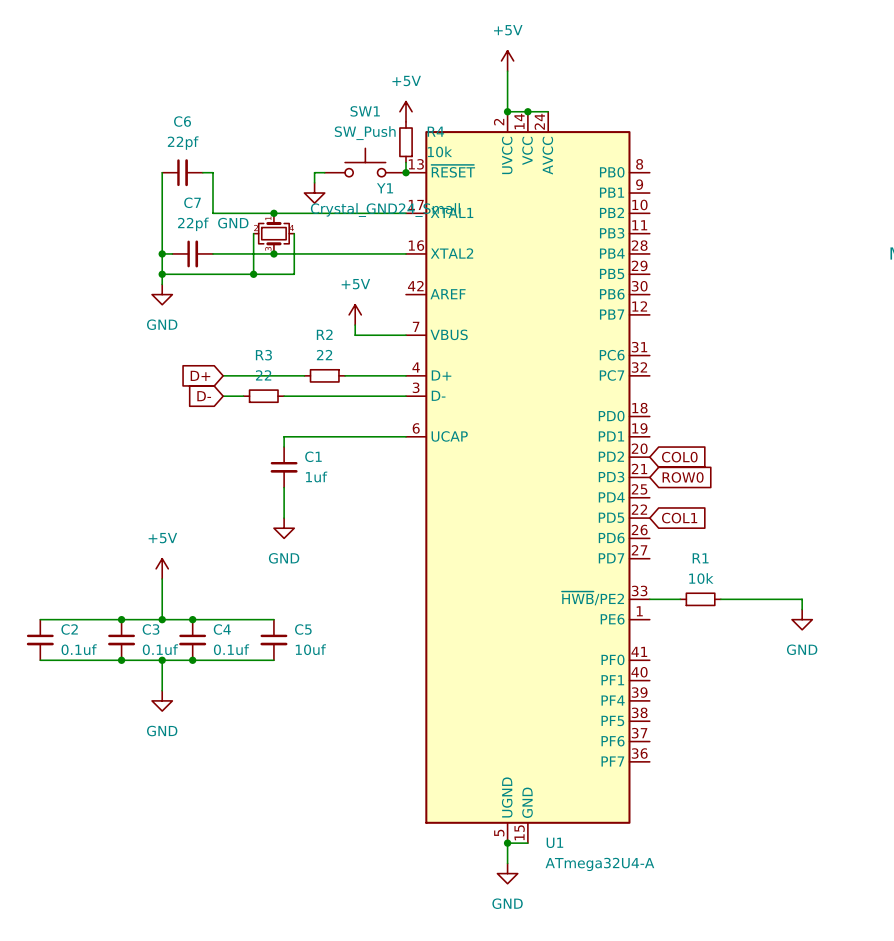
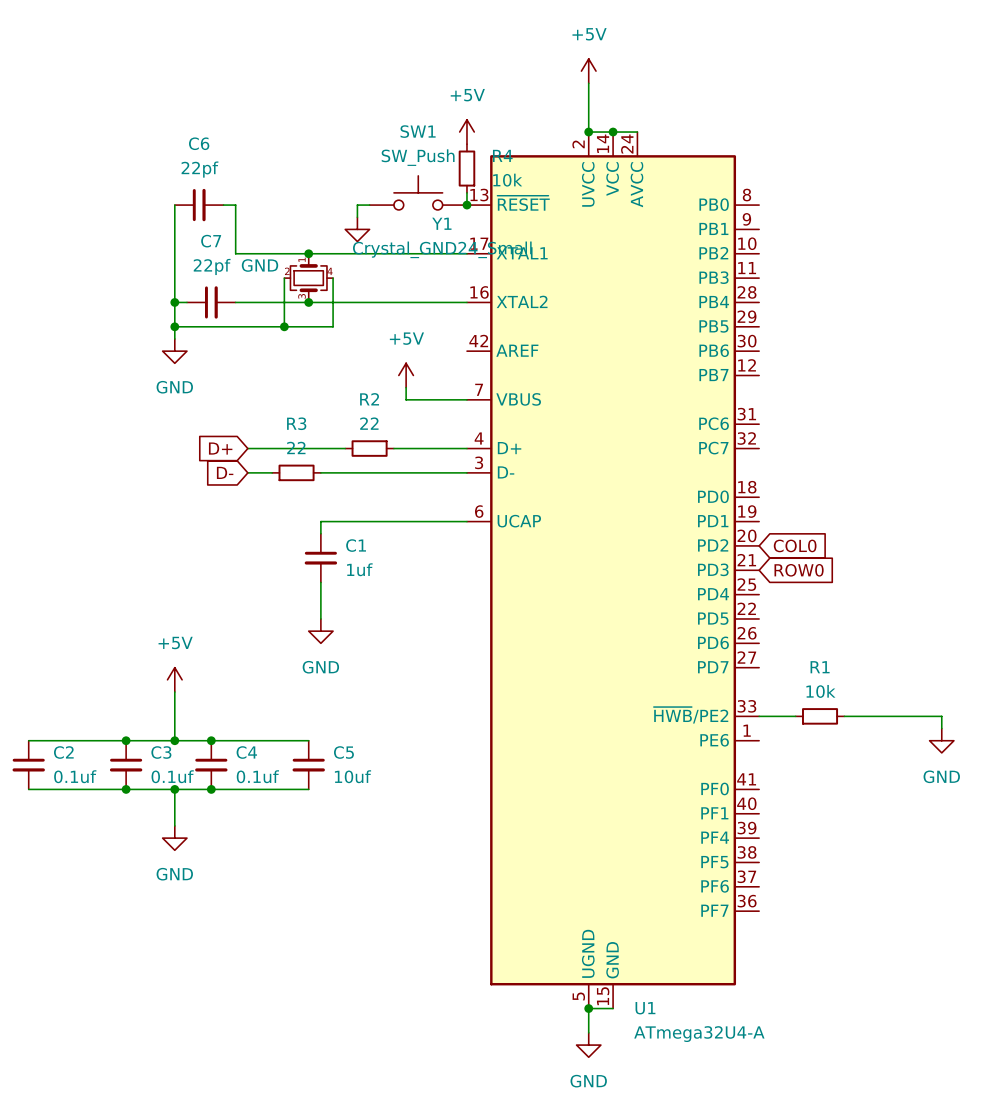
global label: COL1 (679, 518) -> none

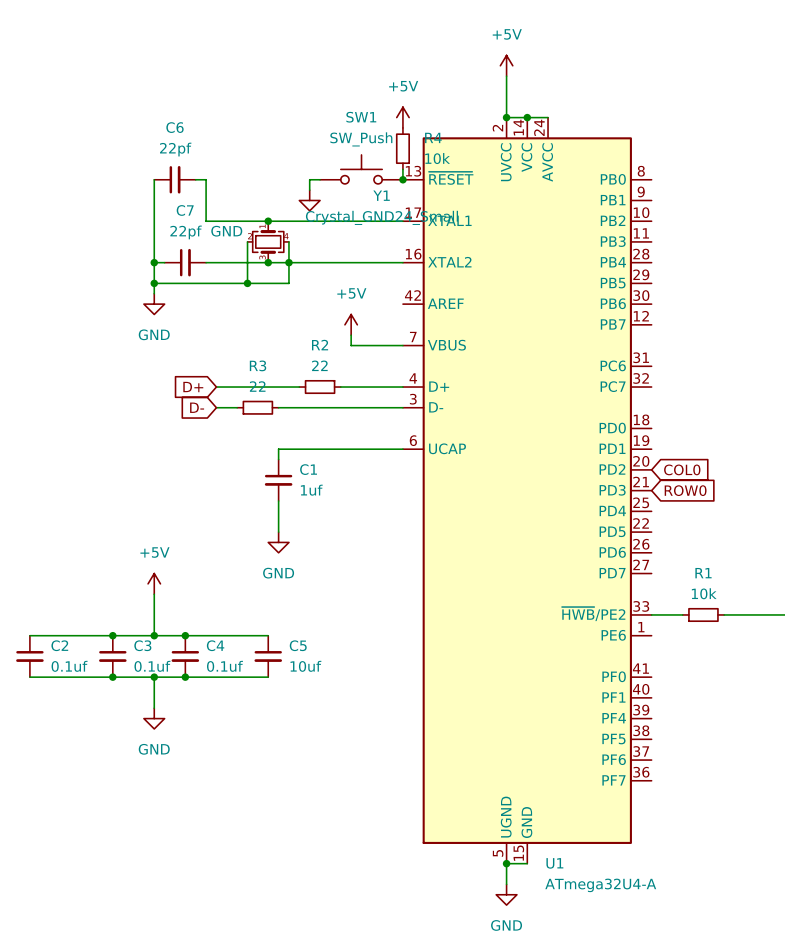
junction: none -> (288, 262)

